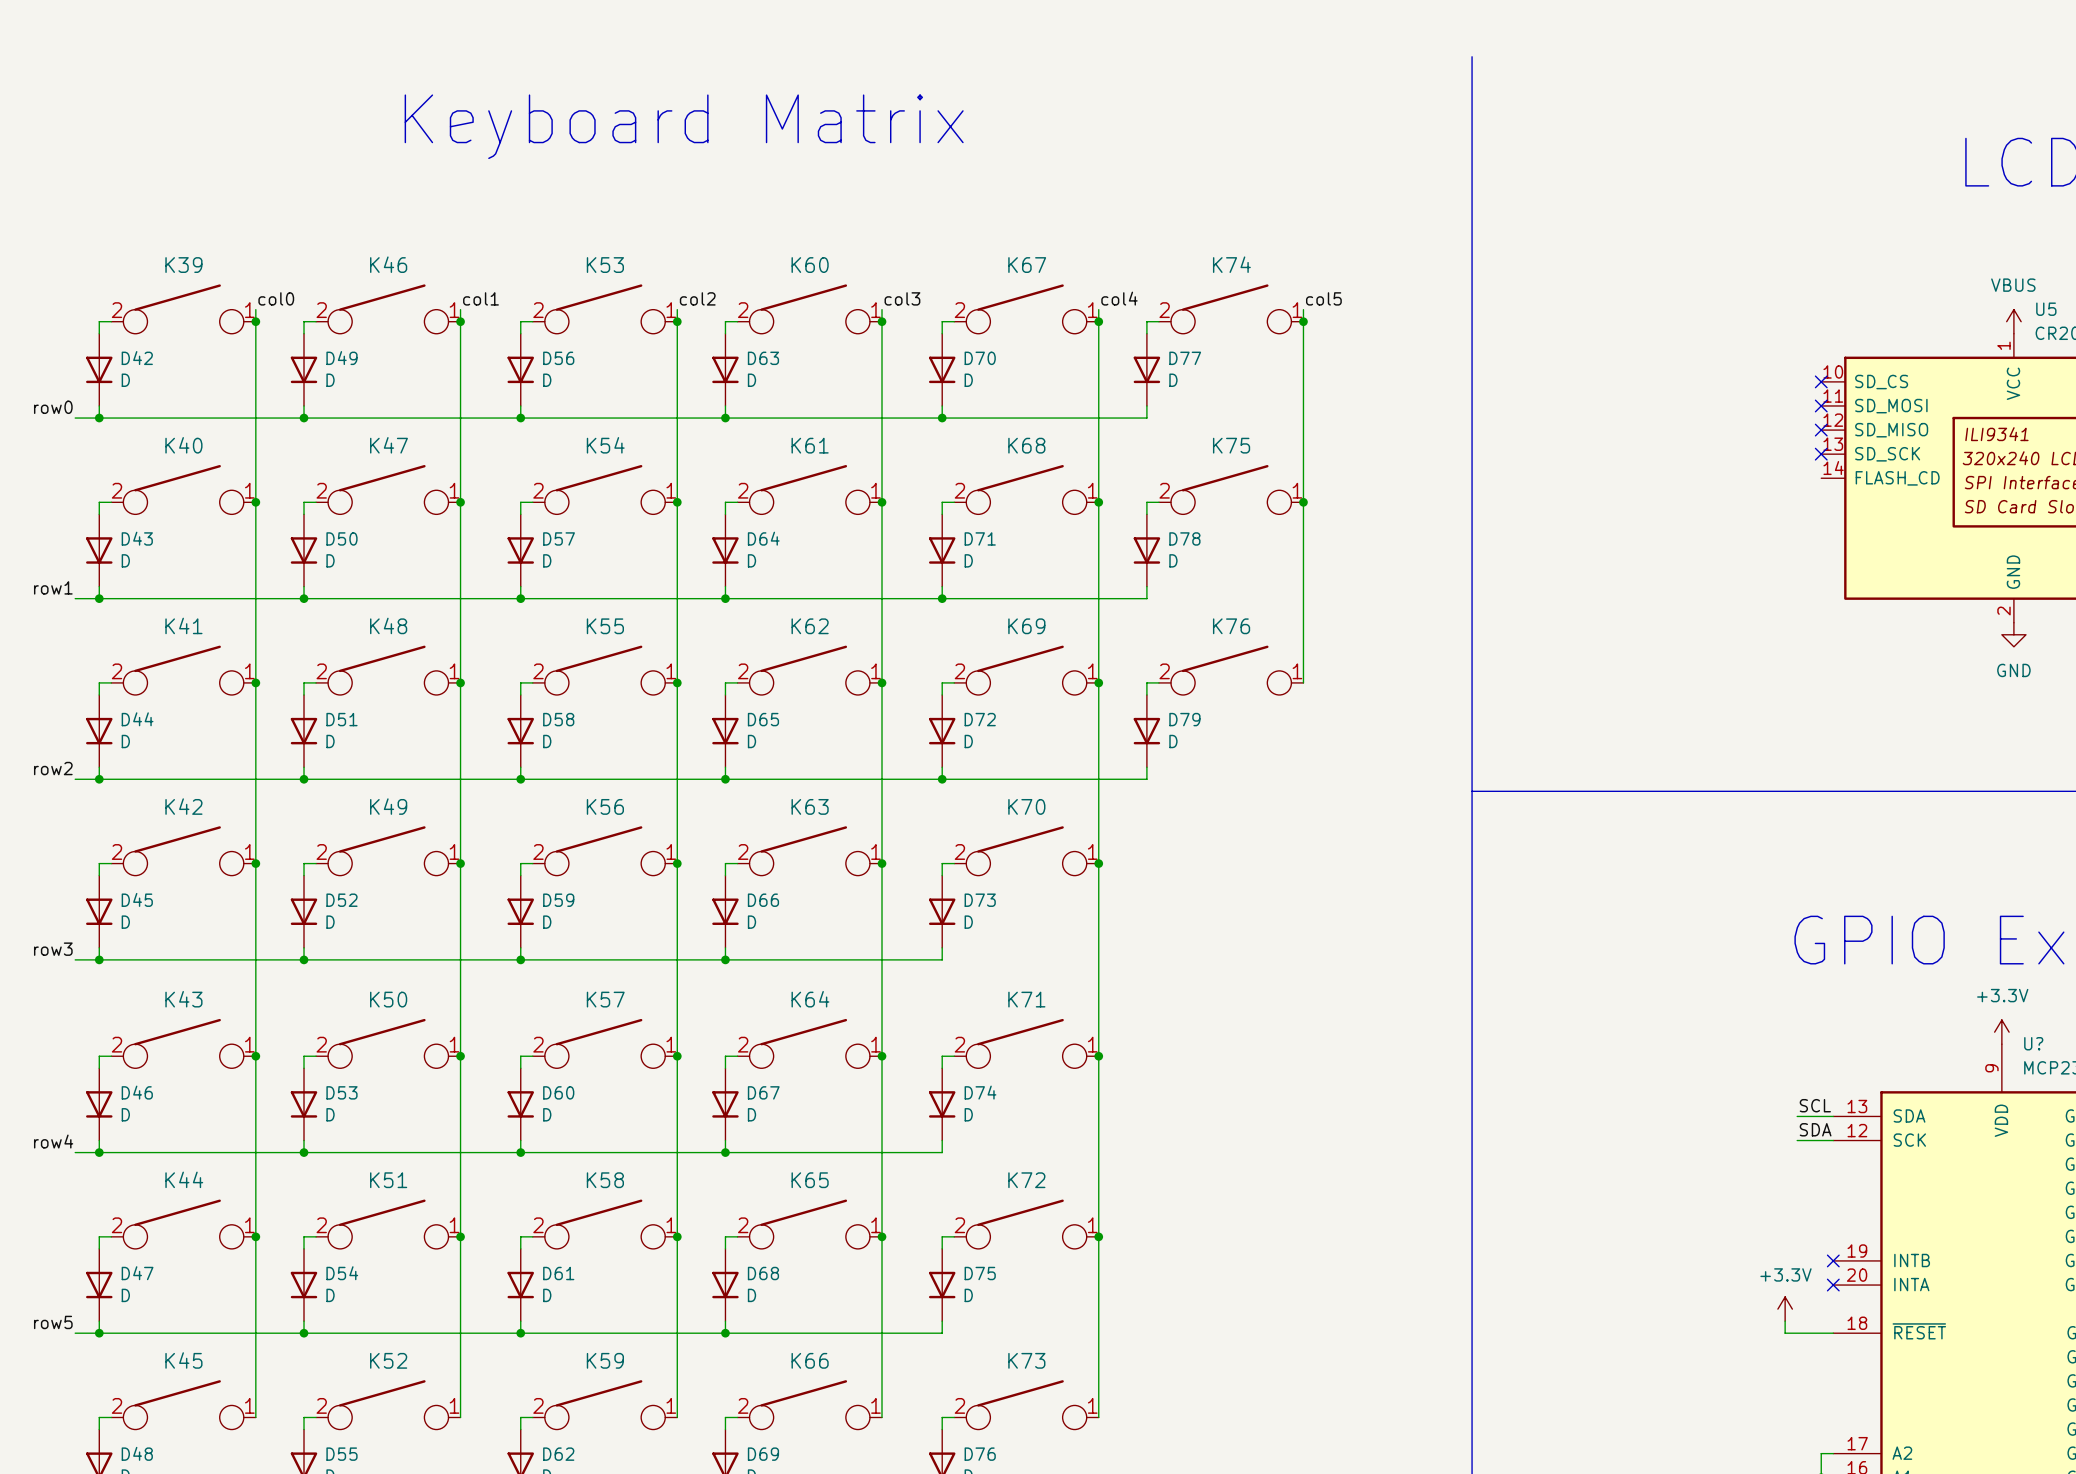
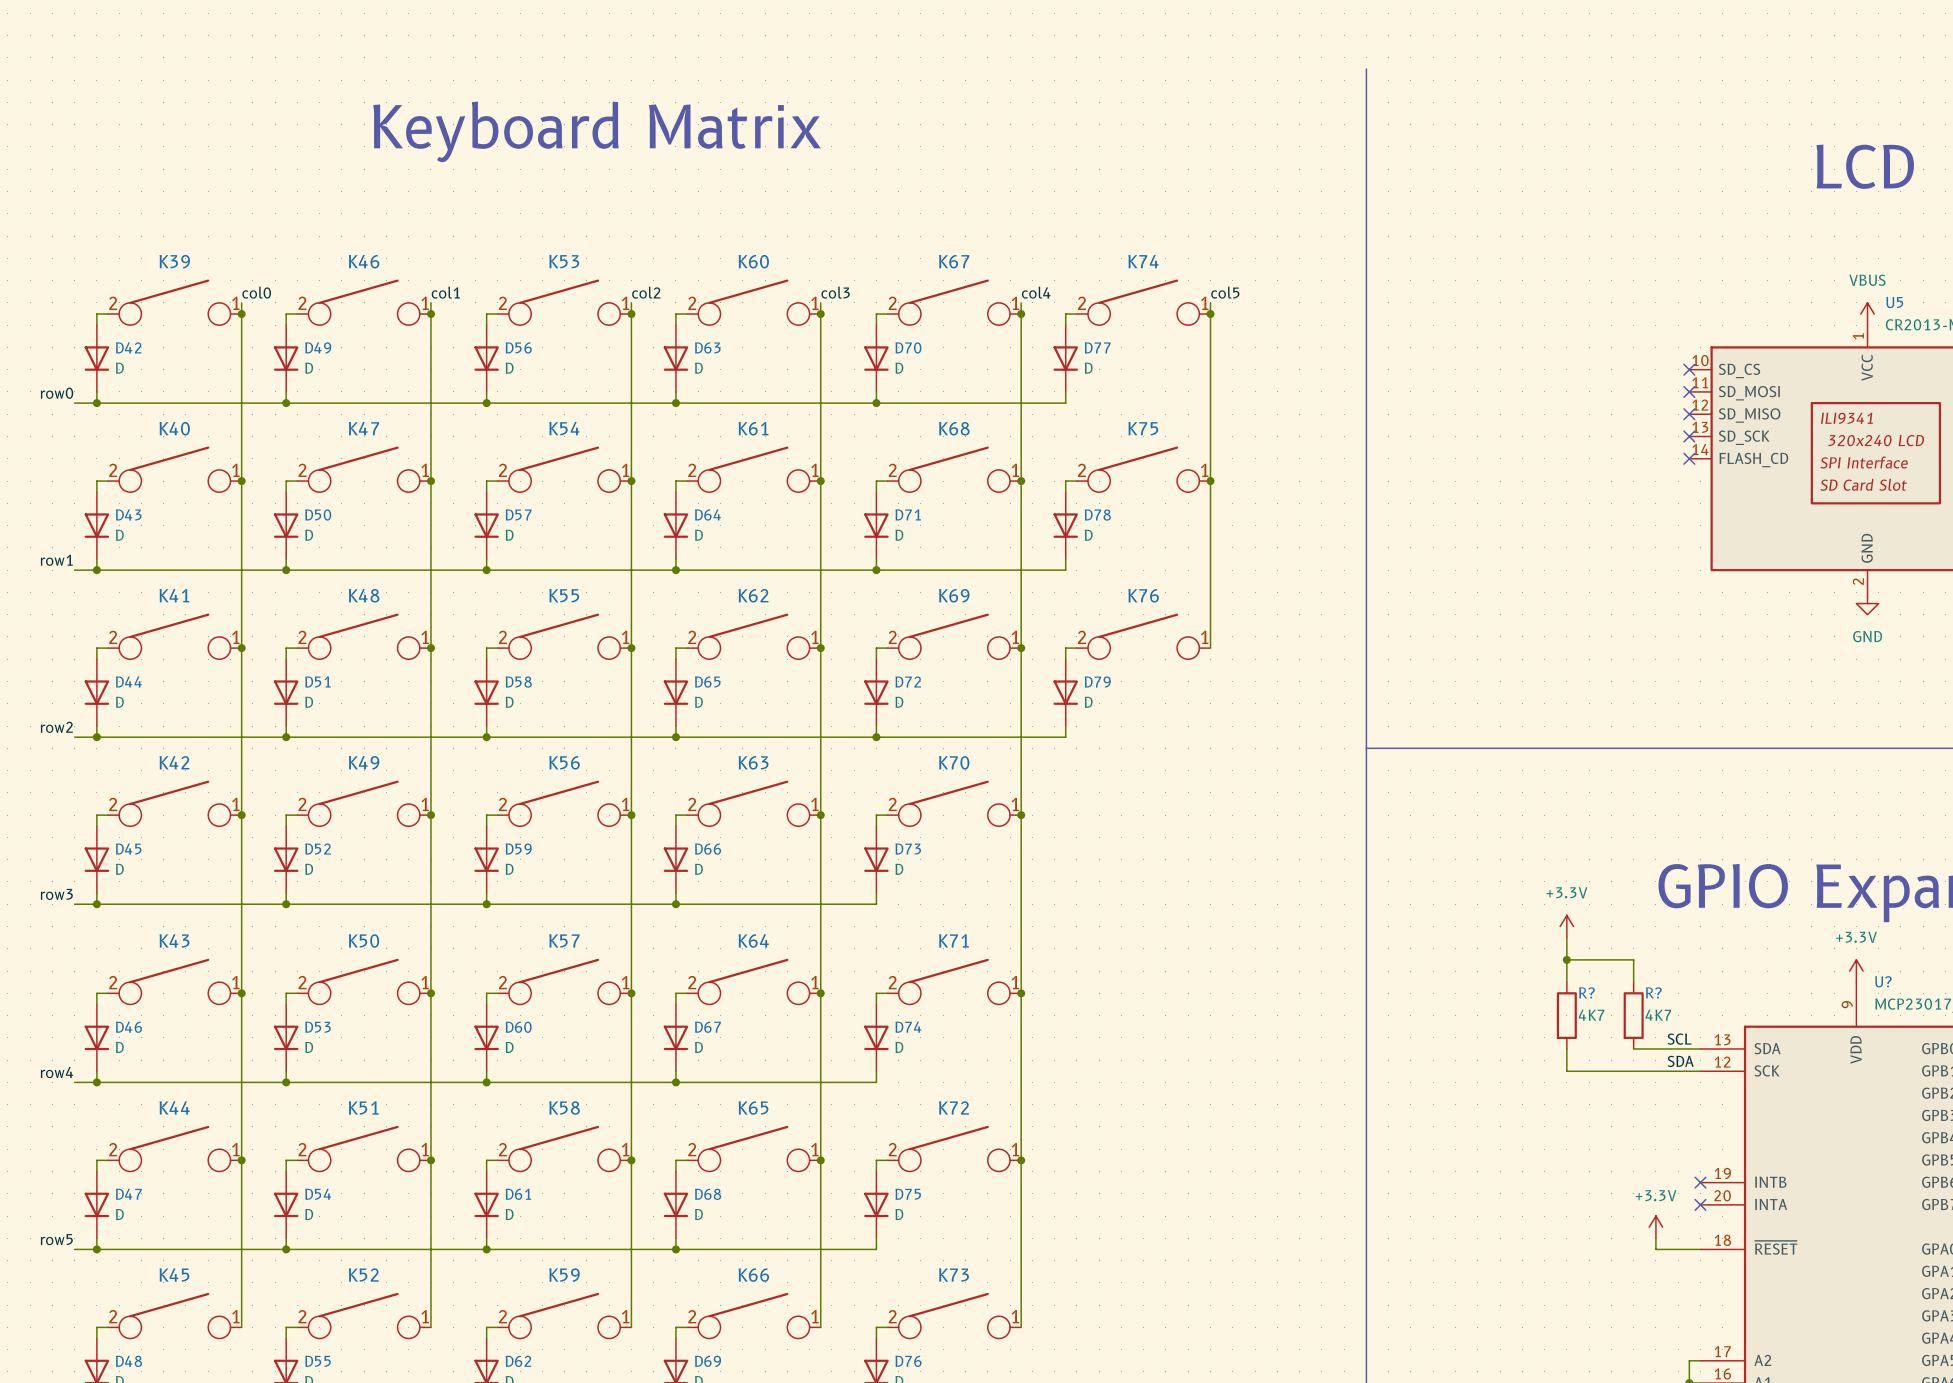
no-connect mark: none -> (1689, 458)
power symbol: none -> +3.3V (1566, 926)
wire: none -> (1566, 937) (1566, 982)
wire: none -> (1566, 959) (1633, 959) (1633, 982)
junction: none -> (1566, 959)
R?: none -> 4K7 (1566, 1015)
R?: none -> 4K7 (1633, 1015)
wire: none -> (1566, 1048) (1566, 1071) (1667, 1071)
wire: none -> (1633, 1048) (1667, 1048)

